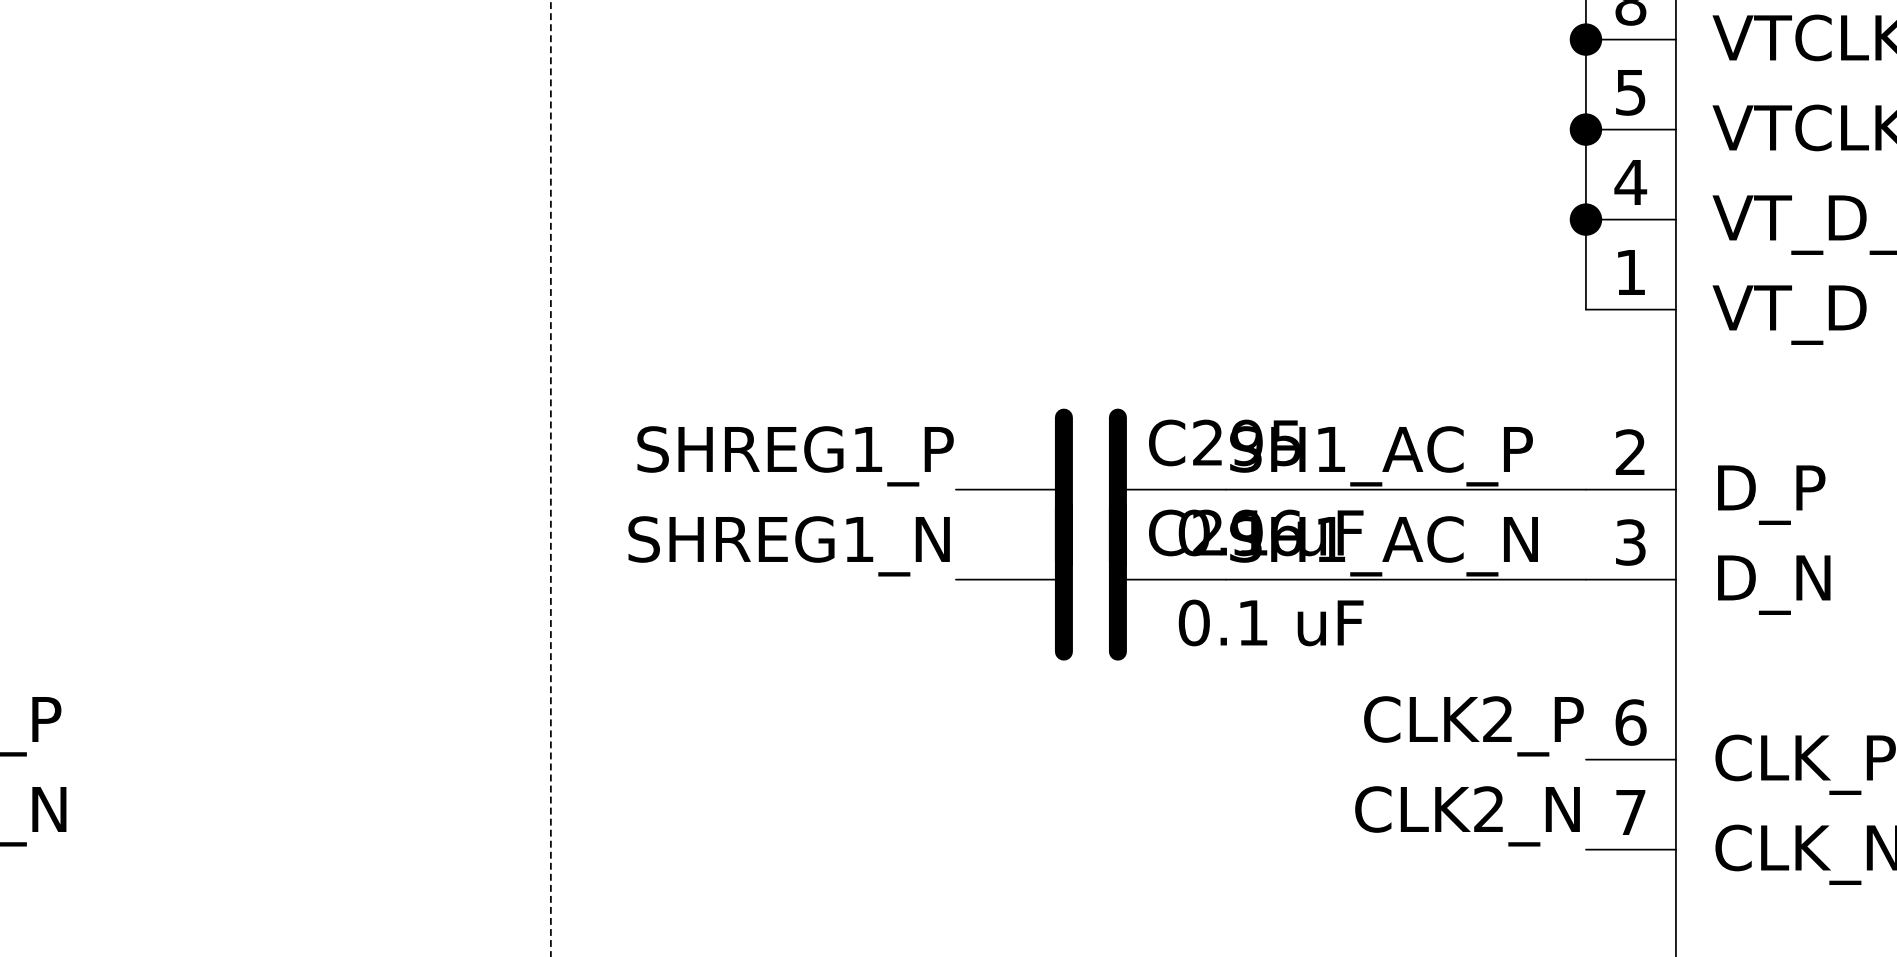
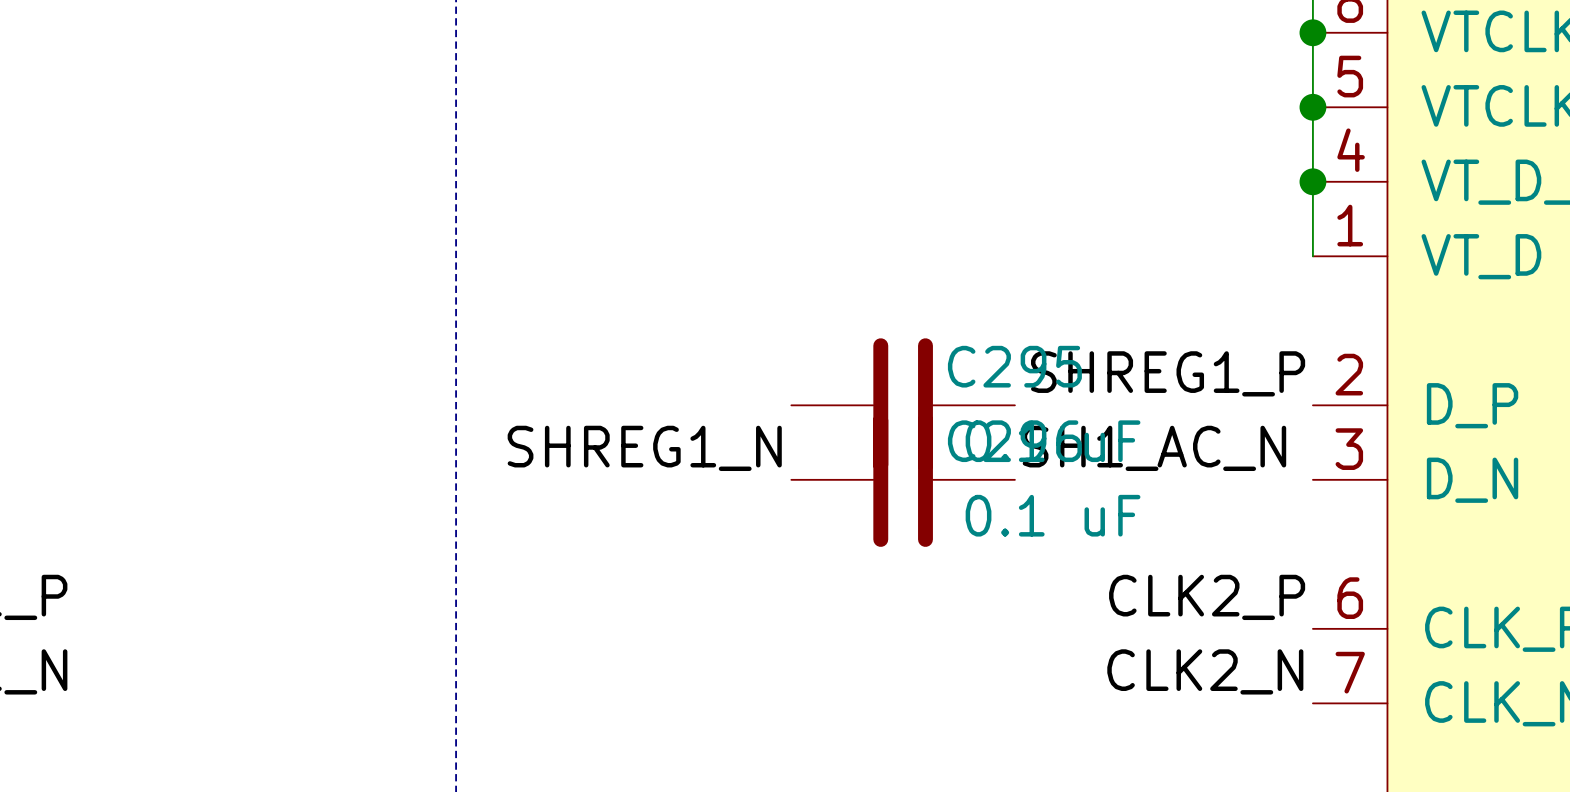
label position: SHREG1_P (795, 456) -> SHREG1_P (1168, 373)
label: SH1_AC_P (1381, 456) -> none
wire: (1225, 489) (1585, 489) -> none
wire: (1225, 579) (1585, 579) -> none

